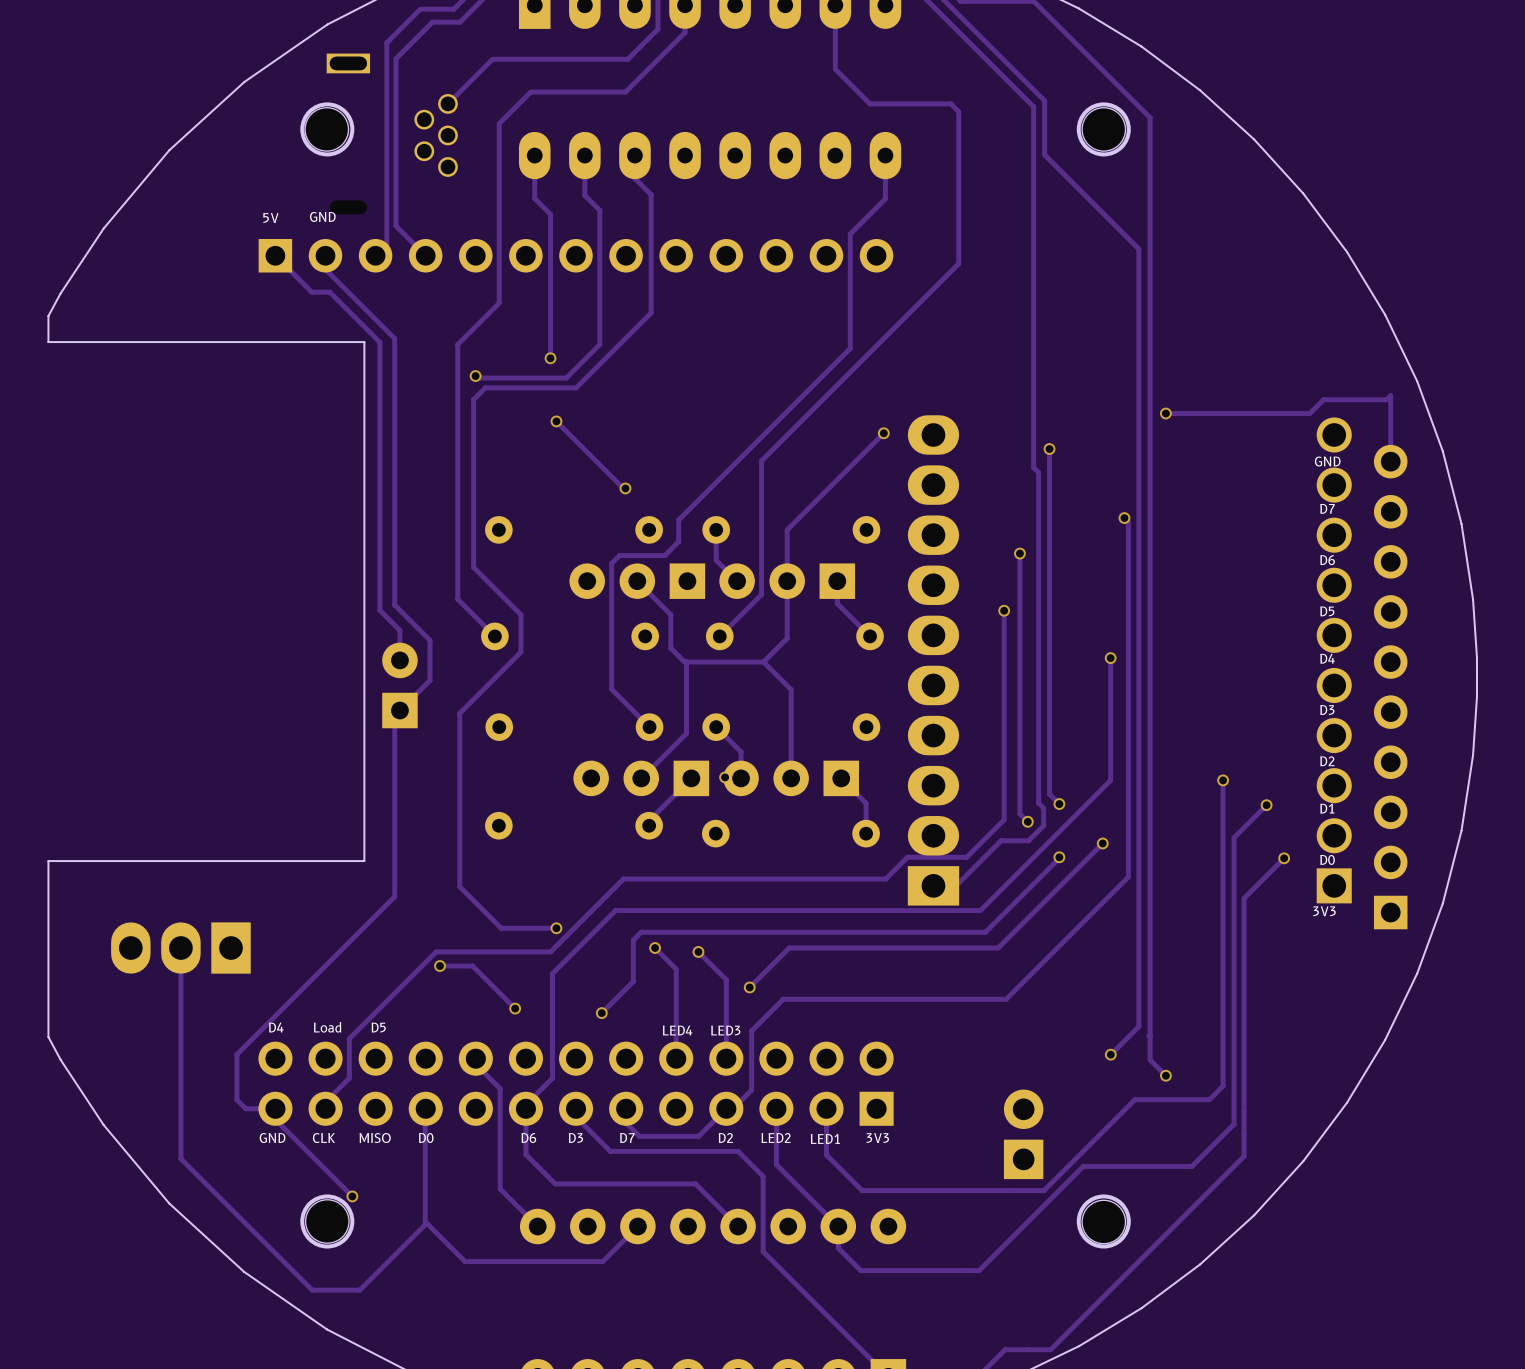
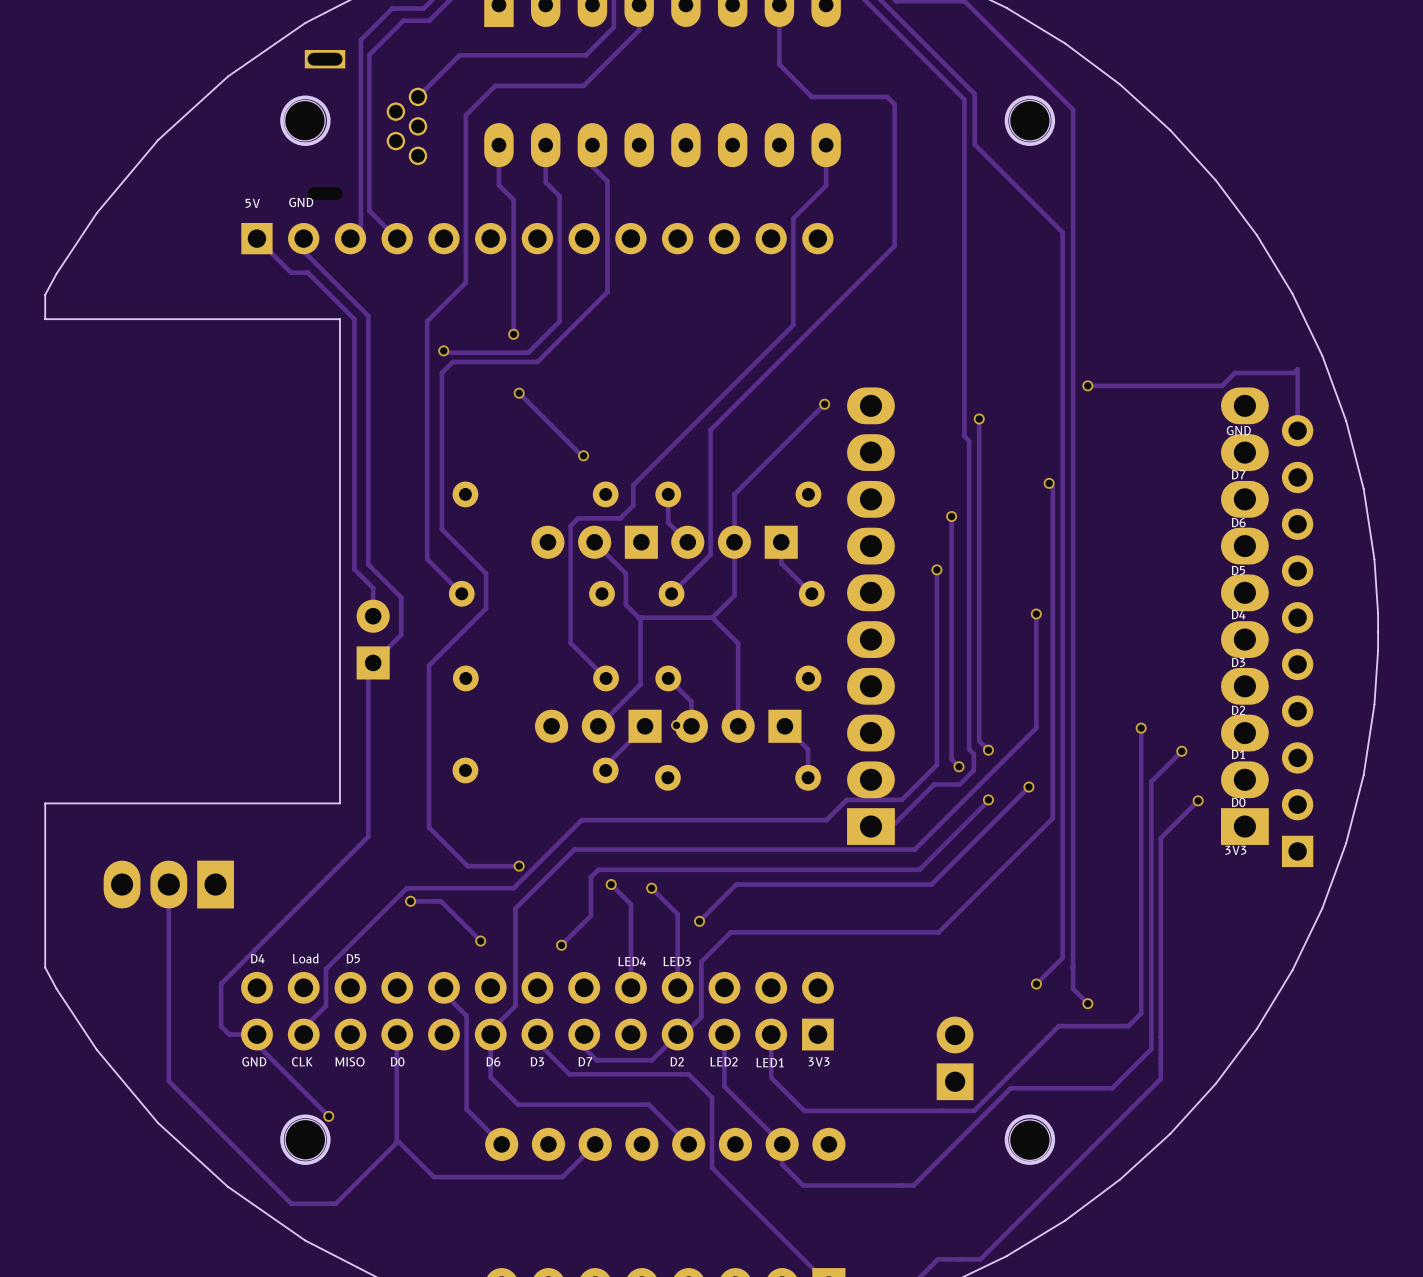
part footprint: [1316, 417, 1352, 904] -> [1220, 387, 1269, 845]

